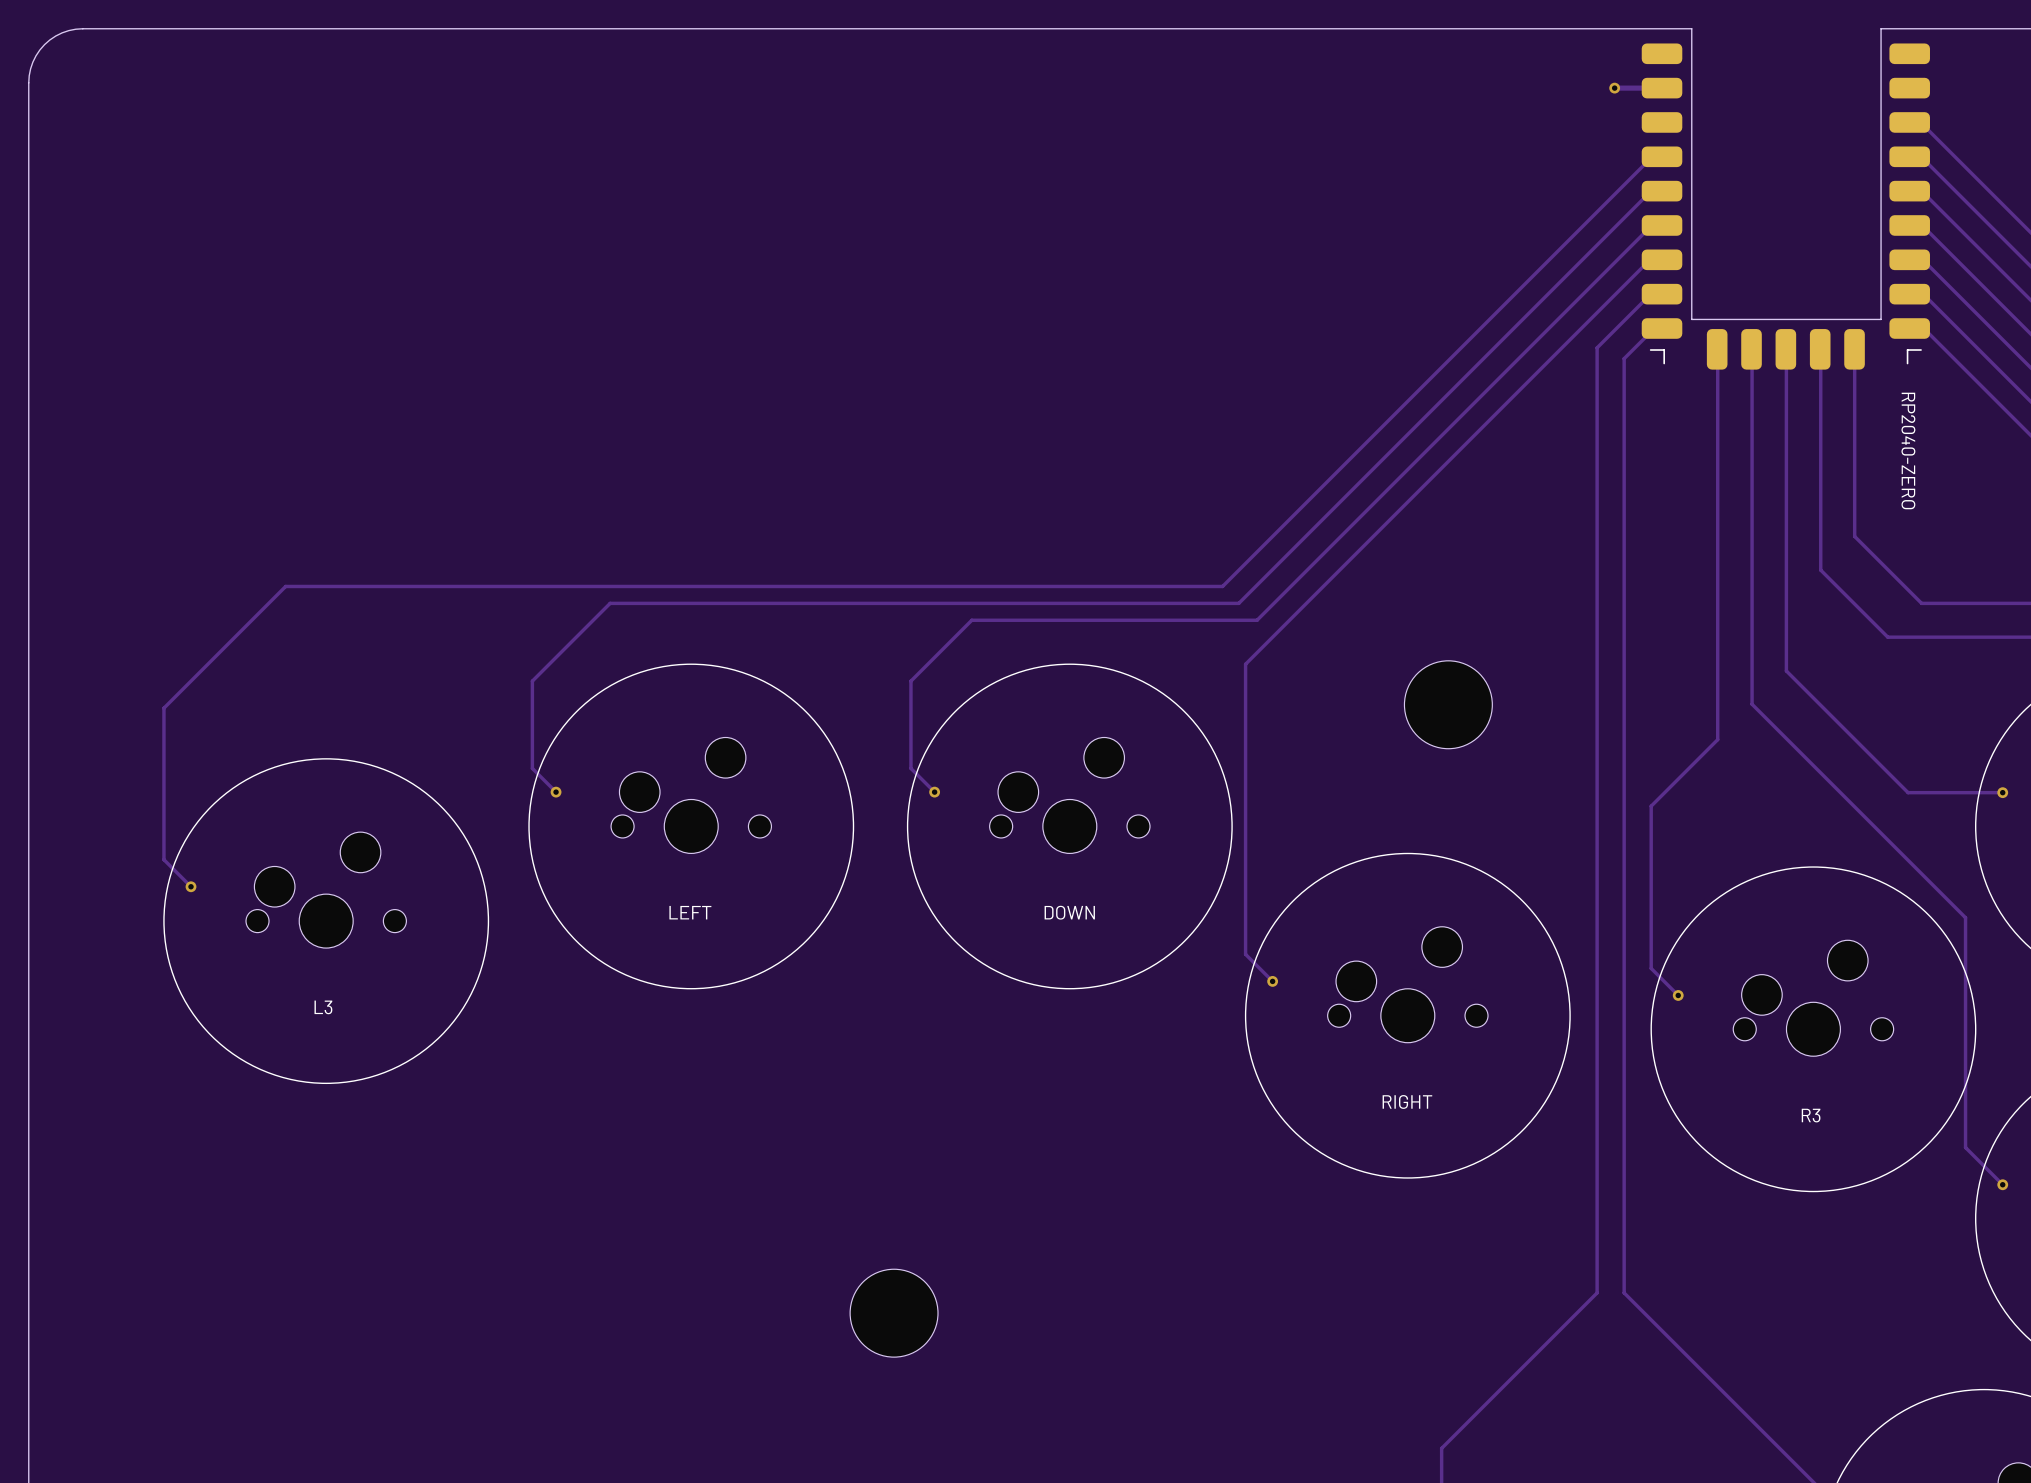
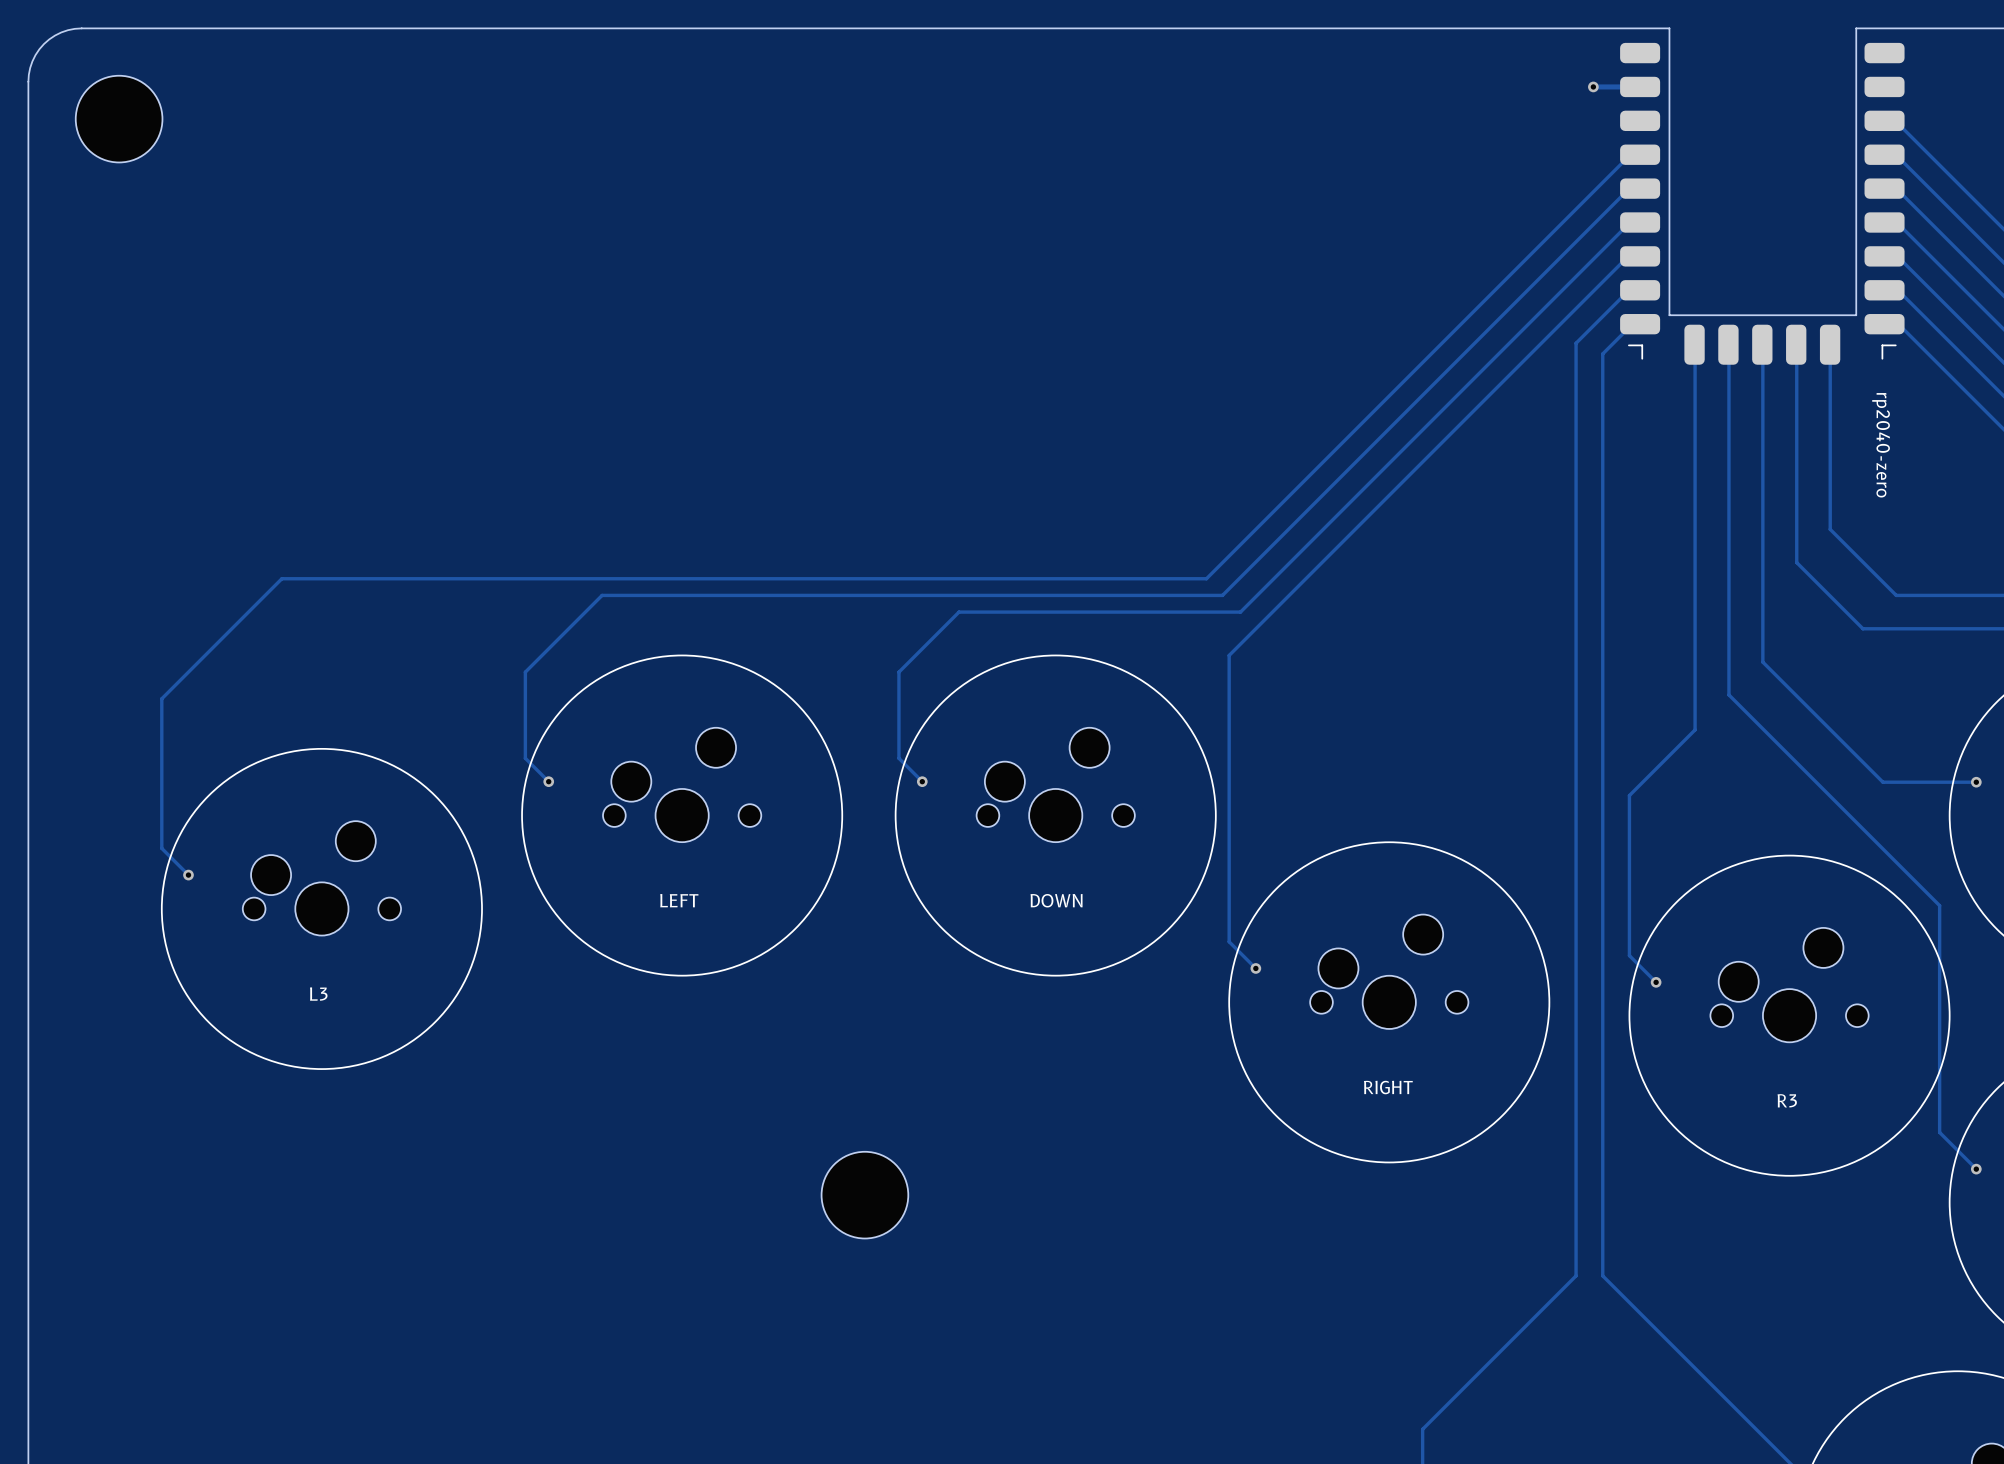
part: none -> (119, 119)
part value: RP2040-ZERO (1908, 450) -> rp2040-zero (1881, 445)
part: (1448, 704) -> none
part position: (894, 1313) -> (864, 1195)

